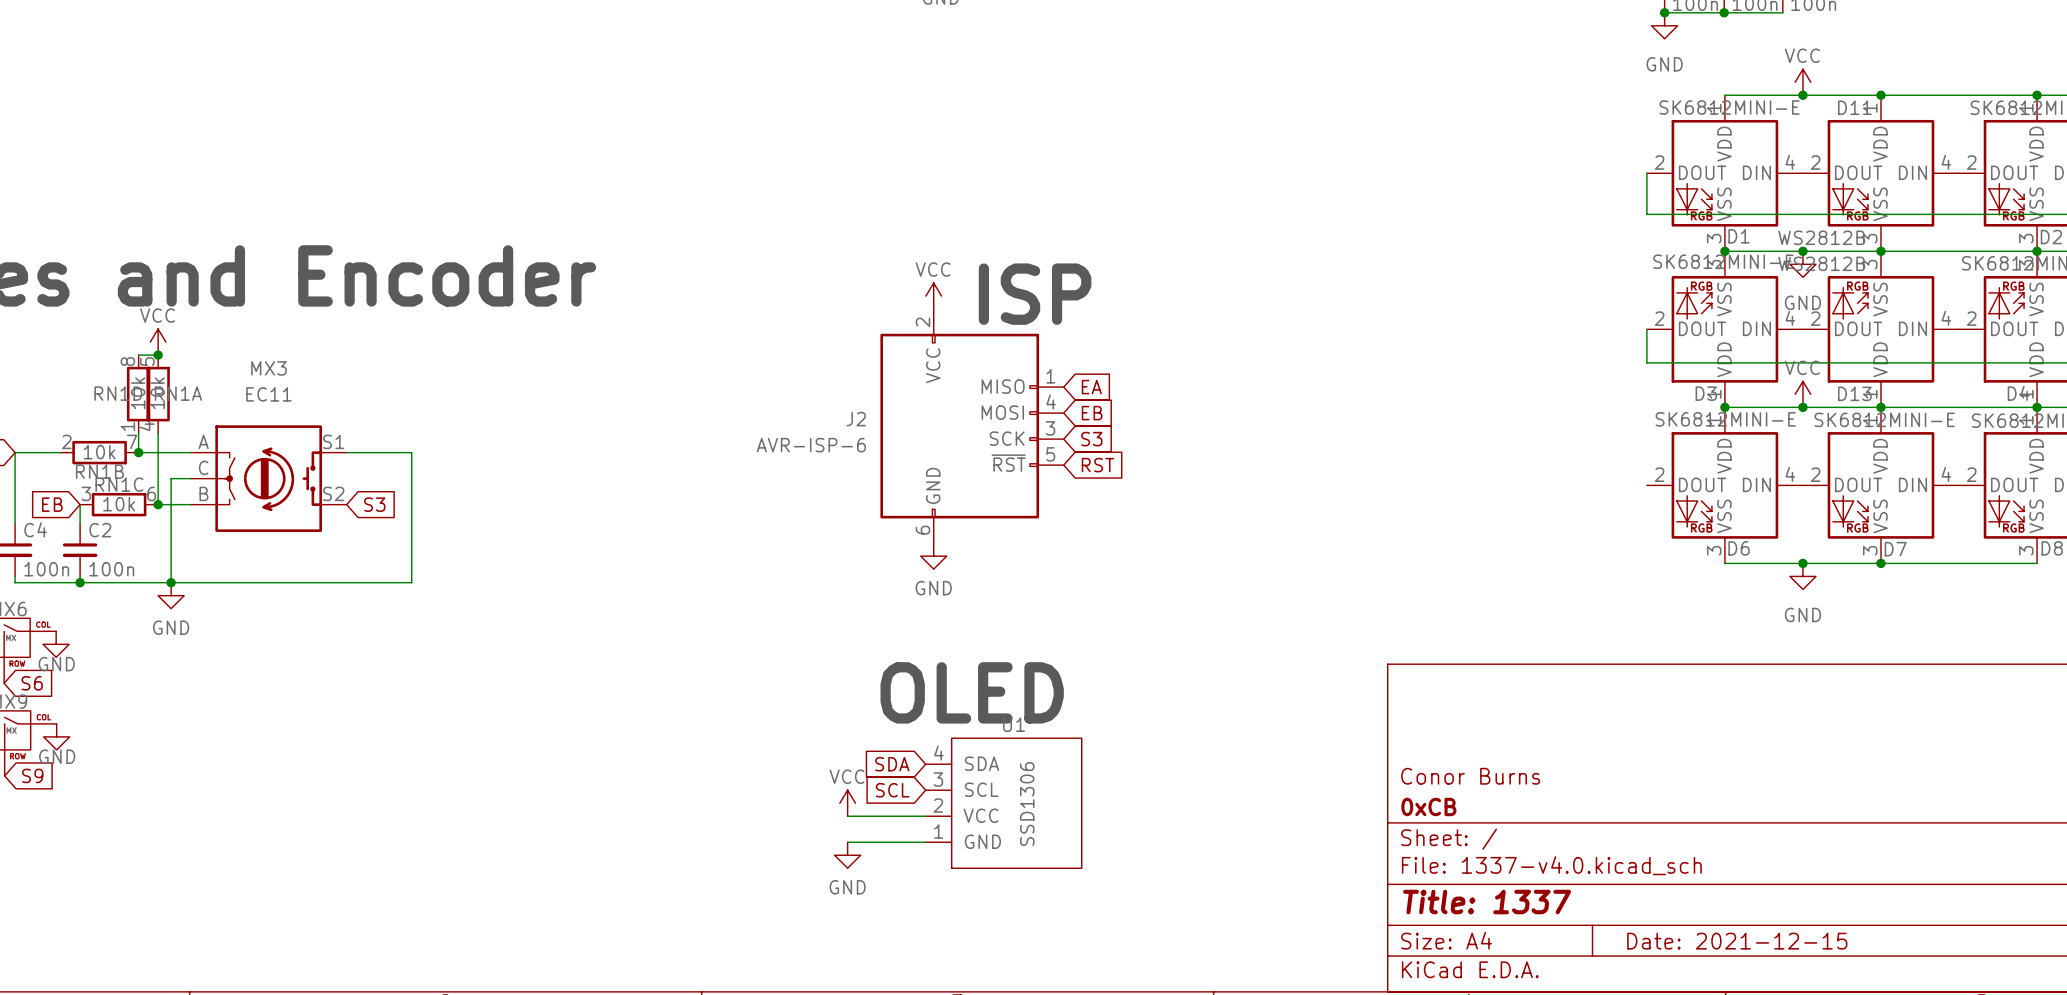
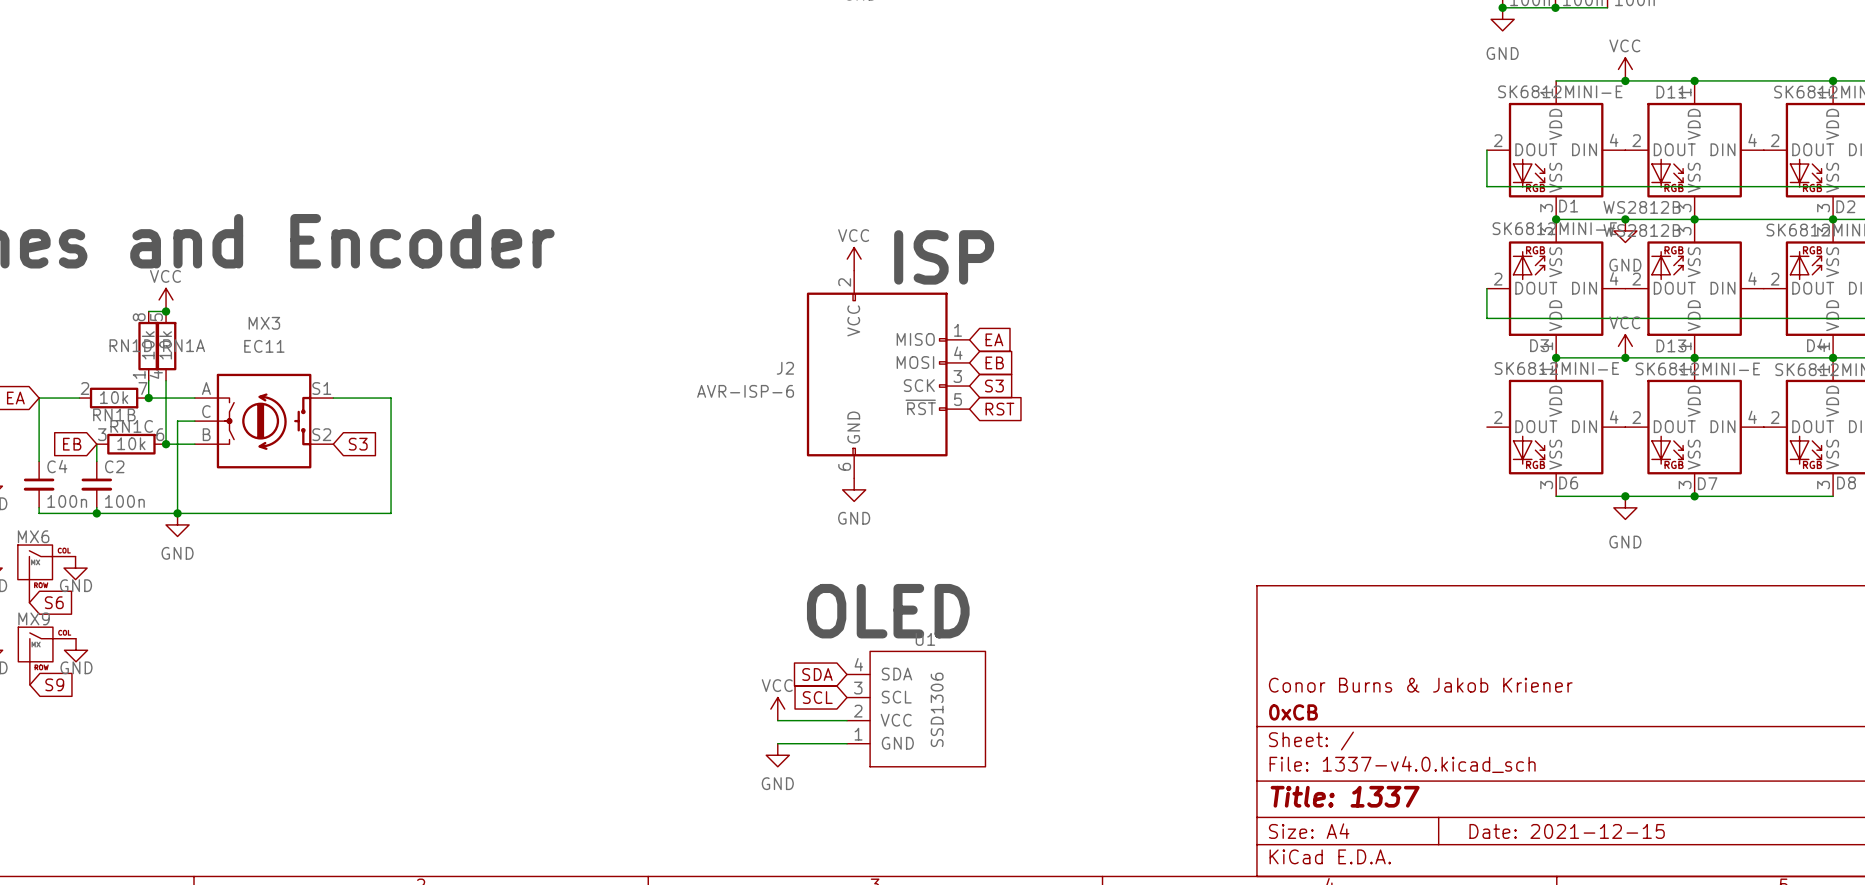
title block: Conor Burns (1470, 776) -> Conor Burns & Jakob Kriener (1420, 685)

